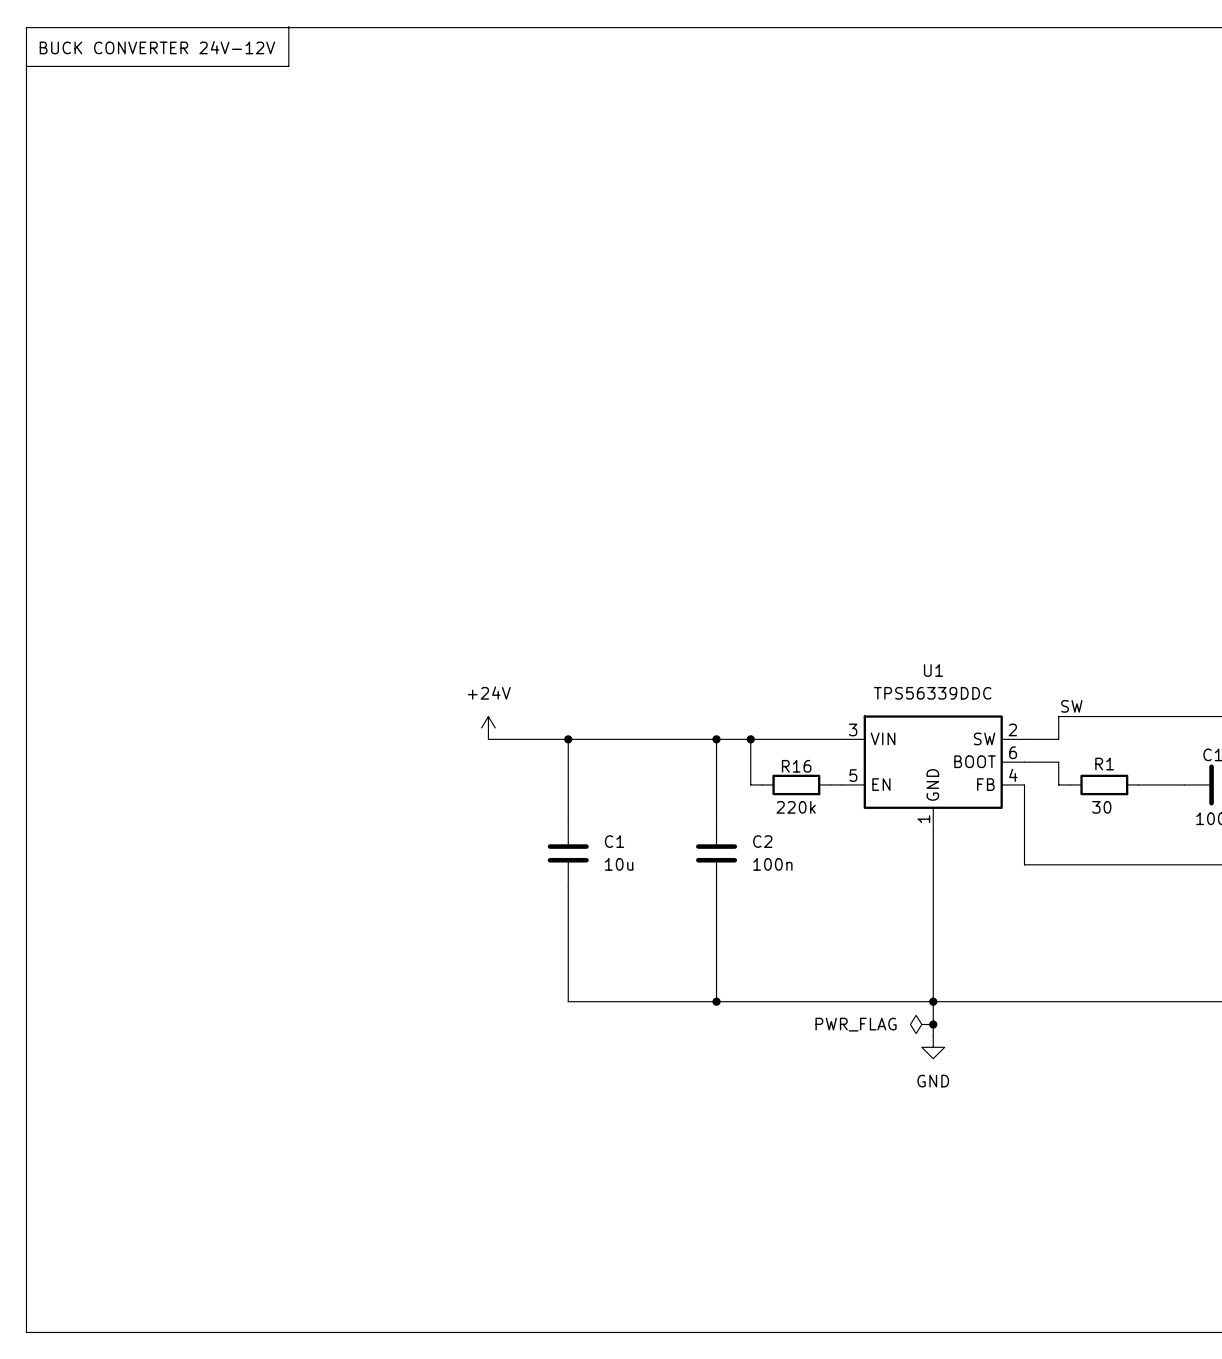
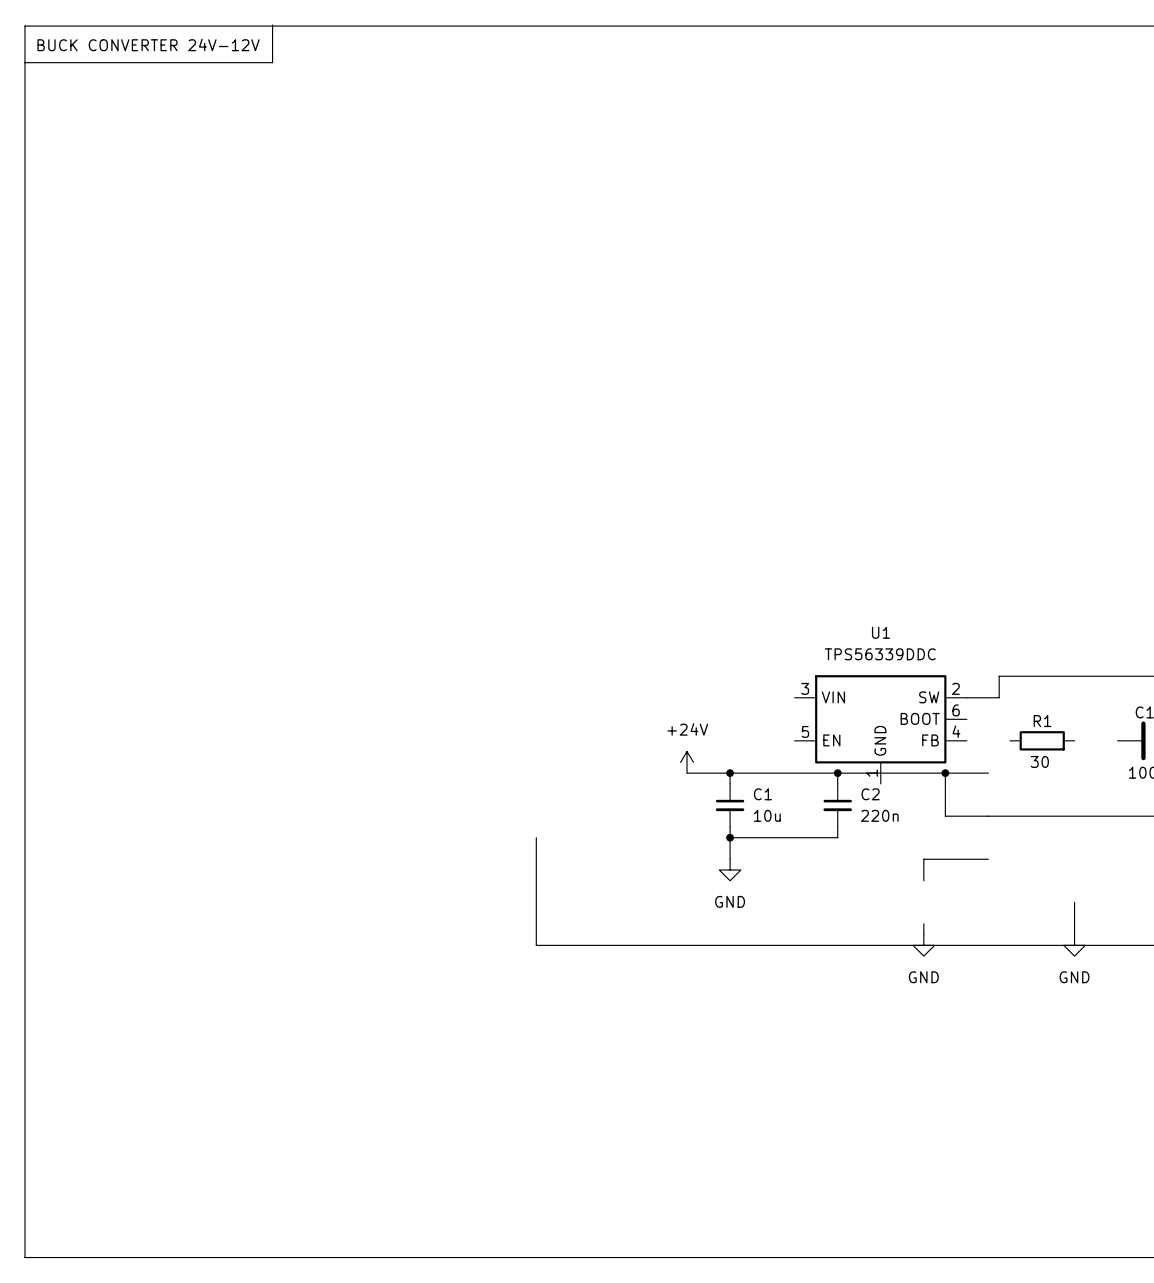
label: SW (1071, 706) -> none
power symbol: +24V (488, 727) -> none
wire: (488, 739) (842, 739) -> none
wire: (568, 739) (568, 819) -> none
junction: (568, 739) -> none
wire: (716, 739) (716, 819) -> none
junction: (716, 739) -> none
wire: (750, 739) (750, 784) (762, 784) -> none
junction: (750, 739) -> none
wire: (1024, 762) (1058, 762) (1058, 784) (1070, 784) -> none
R16: 220k (796, 784) -> none
wire: (830, 784) (842, 784) -> none
wire: (1024, 784) (1024, 864) -> (945, 773) (945, 816) (966, 816)
wire: (1138, 784) (1184, 784) -> none
power symbol: none -> +24V (687, 762)
C1 symbol: [547, 819, 589, 888] -> [715, 783, 745, 827]
C2 symbol: [696, 819, 738, 888] -> [823, 783, 853, 827]
wire: none -> (687, 773) (988, 773)
wire: none -> (730, 773) (730, 783)
junction: none -> (730, 773)
wire: none -> (837, 773) (837, 783)
junction: none -> (837, 773)
junction: none -> (945, 773)
wire: (933, 830) (933, 1035) -> none
C2 value: 100n (772, 864) -> 220n (879, 815)
wire: none -> (730, 826) (730, 859)
wire: none -> (837, 826) (837, 837) (730, 837)
wire: (716, 887) (716, 1001) -> none
junction: none -> (730, 837)
wire: none -> (988, 859) (923, 859) (923, 880)
power symbol: none -> GND (730, 870)
wire: none -> (1074, 902) (1074, 934)
wire: none -> (923, 923) (923, 934)
junction: (716, 1001) -> none
junction: (933, 1001) -> none
power symbol: none -> GND (1074, 945)
power symbol: PWR_FLAG (921, 1024) -> none
junction: (933, 1024) -> none
power symbol position: GND (933, 1047) -> GND (923, 945)

